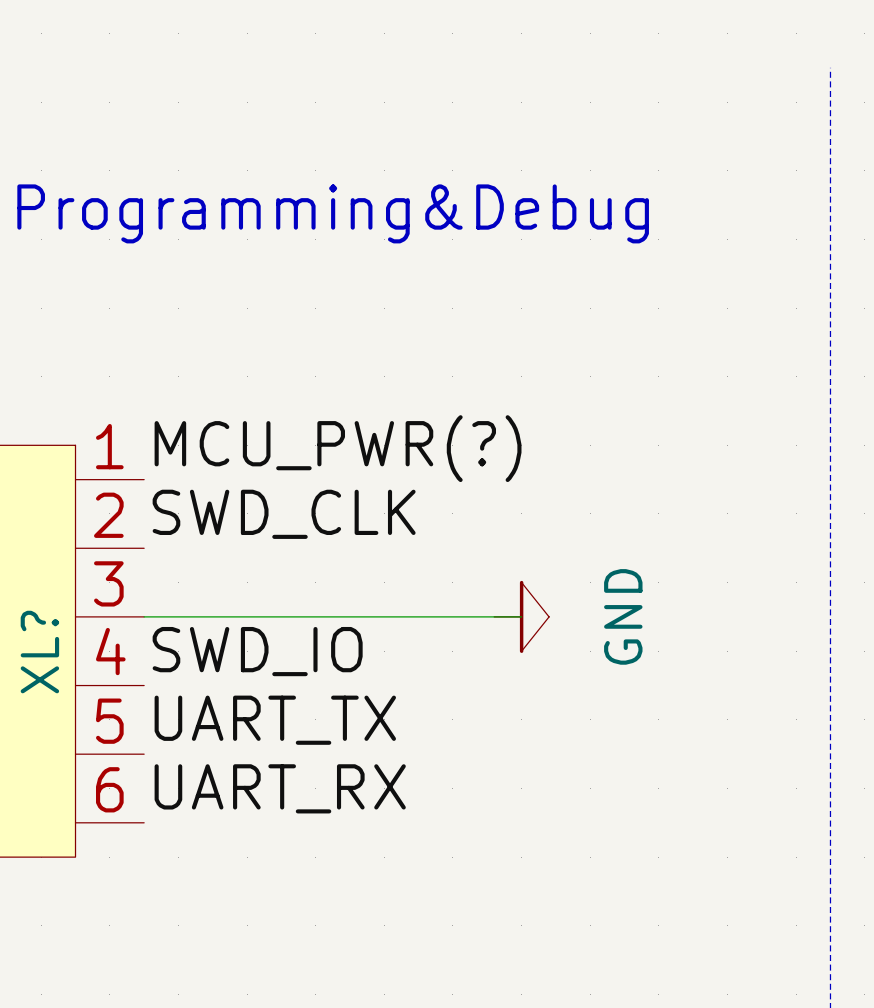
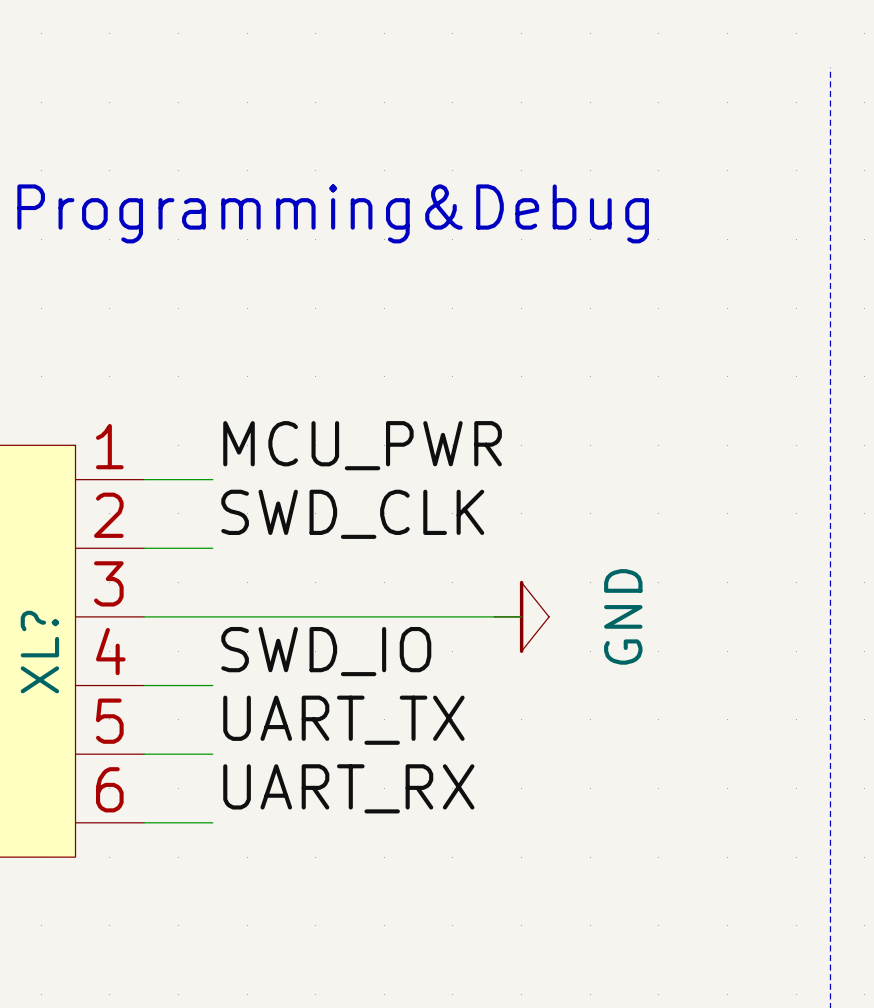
label: MCU_PWR(?) (338, 448) -> MCU_PWR (362, 445)
wire: none -> (144, 479) (212, 479)
label position: SWD_CLK (284, 514) -> SWD_CLK (352, 514)
wire: none -> (144, 548) (212, 548)
label position: SWD_IO (257, 651) -> SWD_IO (326, 651)
wire: none -> (144, 685) (212, 685)
label position: UART_TX (275, 720) -> UART_TX (343, 720)
wire: none -> (144, 754) (212, 754)
label position: UART_RX (280, 788) -> UART_RX (348, 788)
wire: none -> (144, 822) (212, 822)

